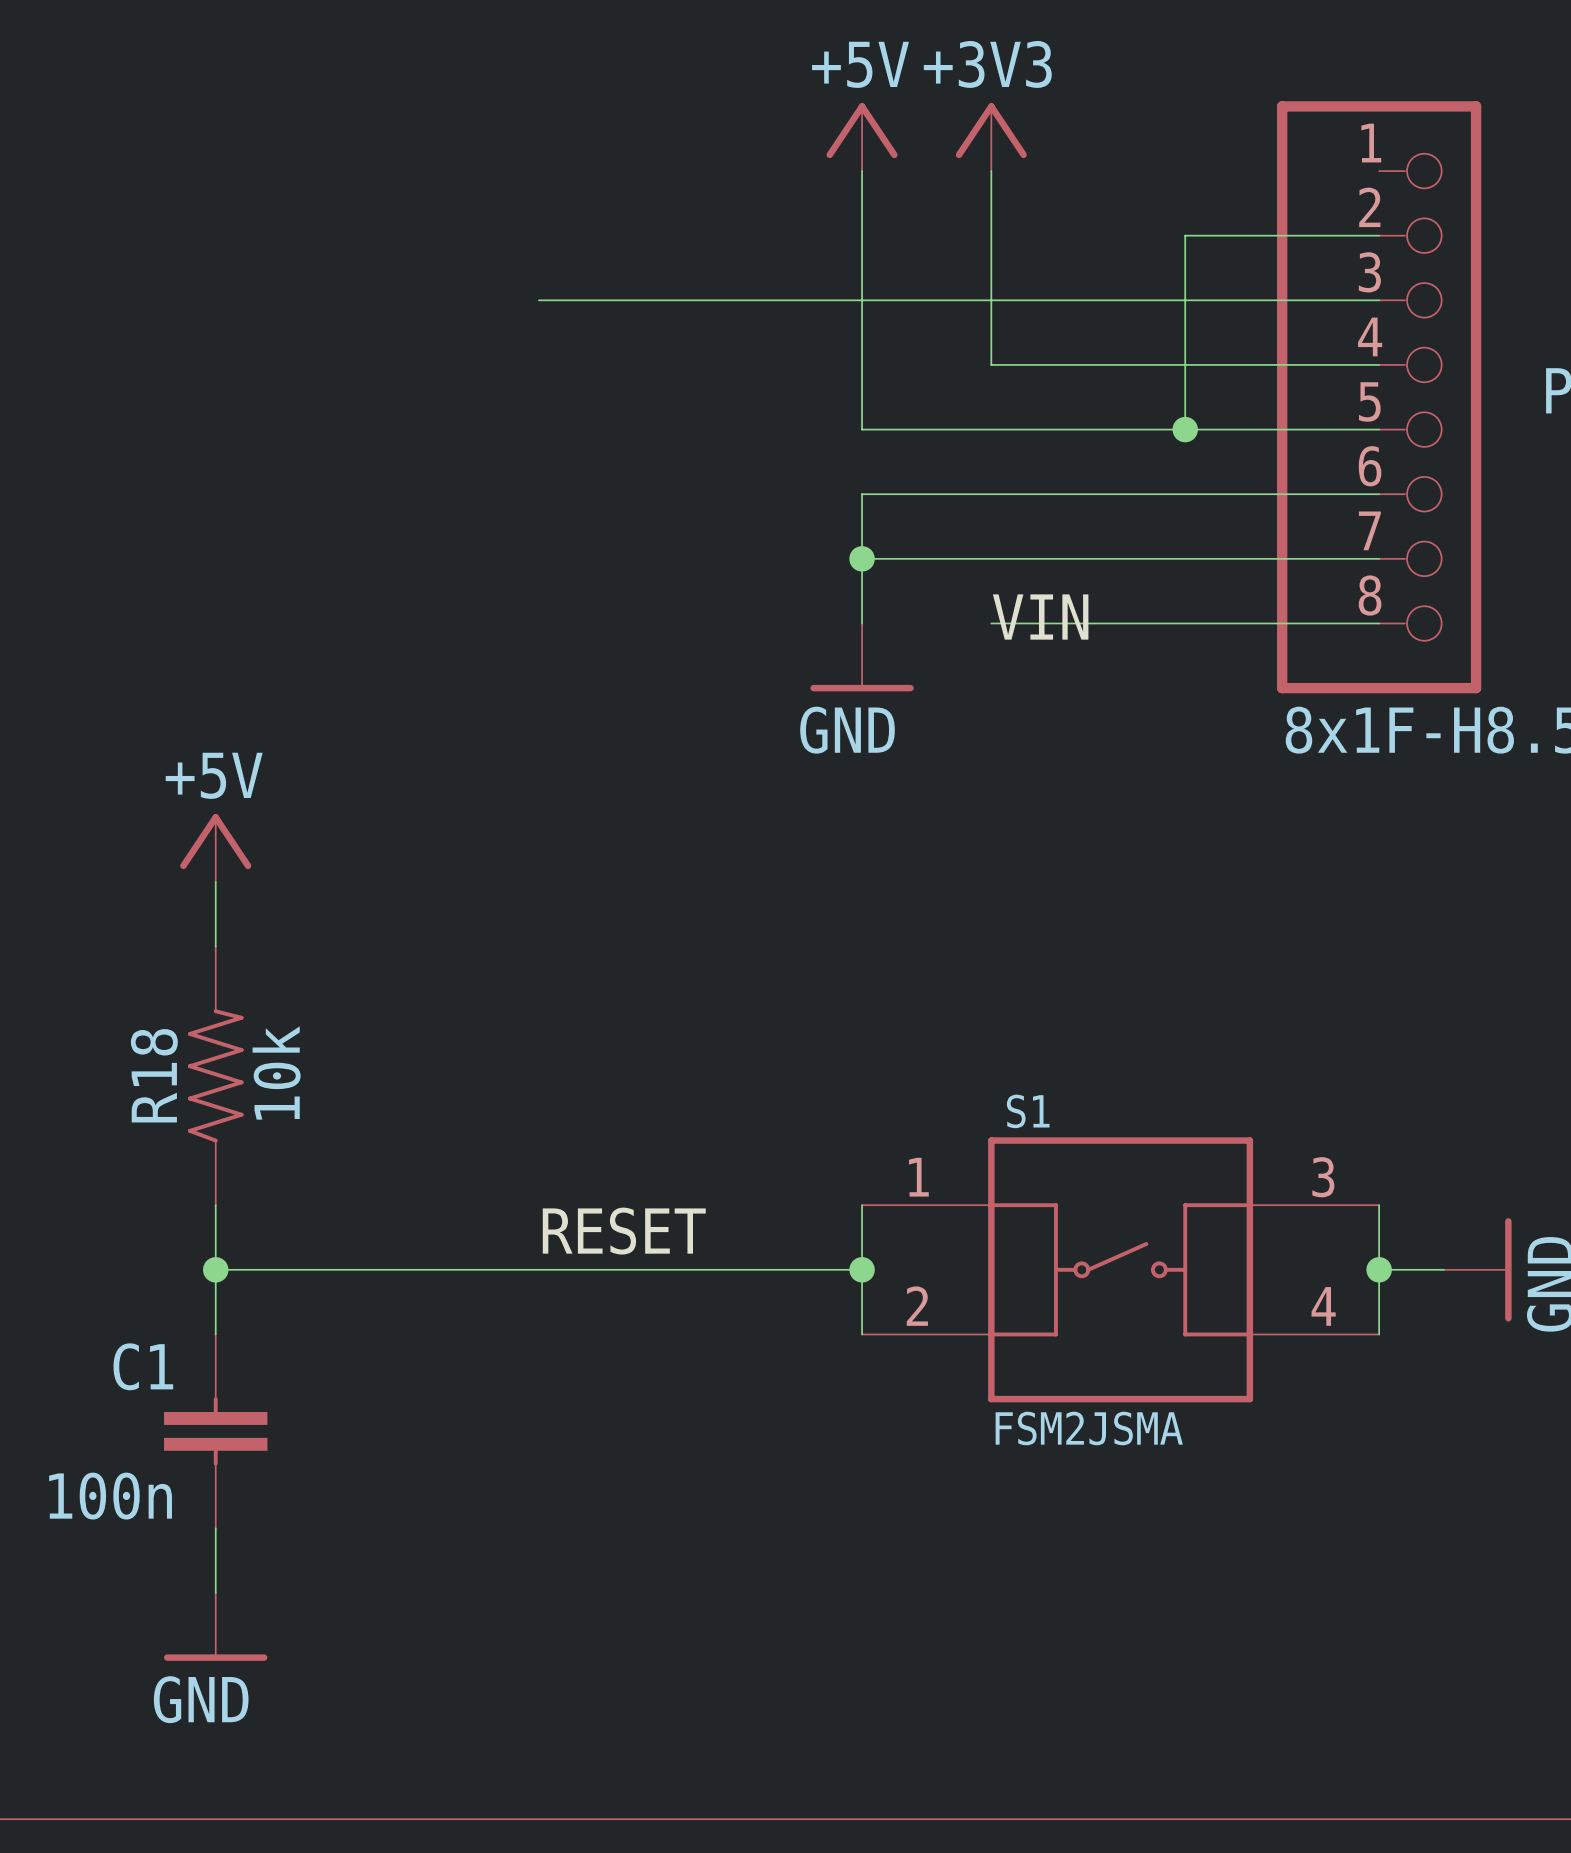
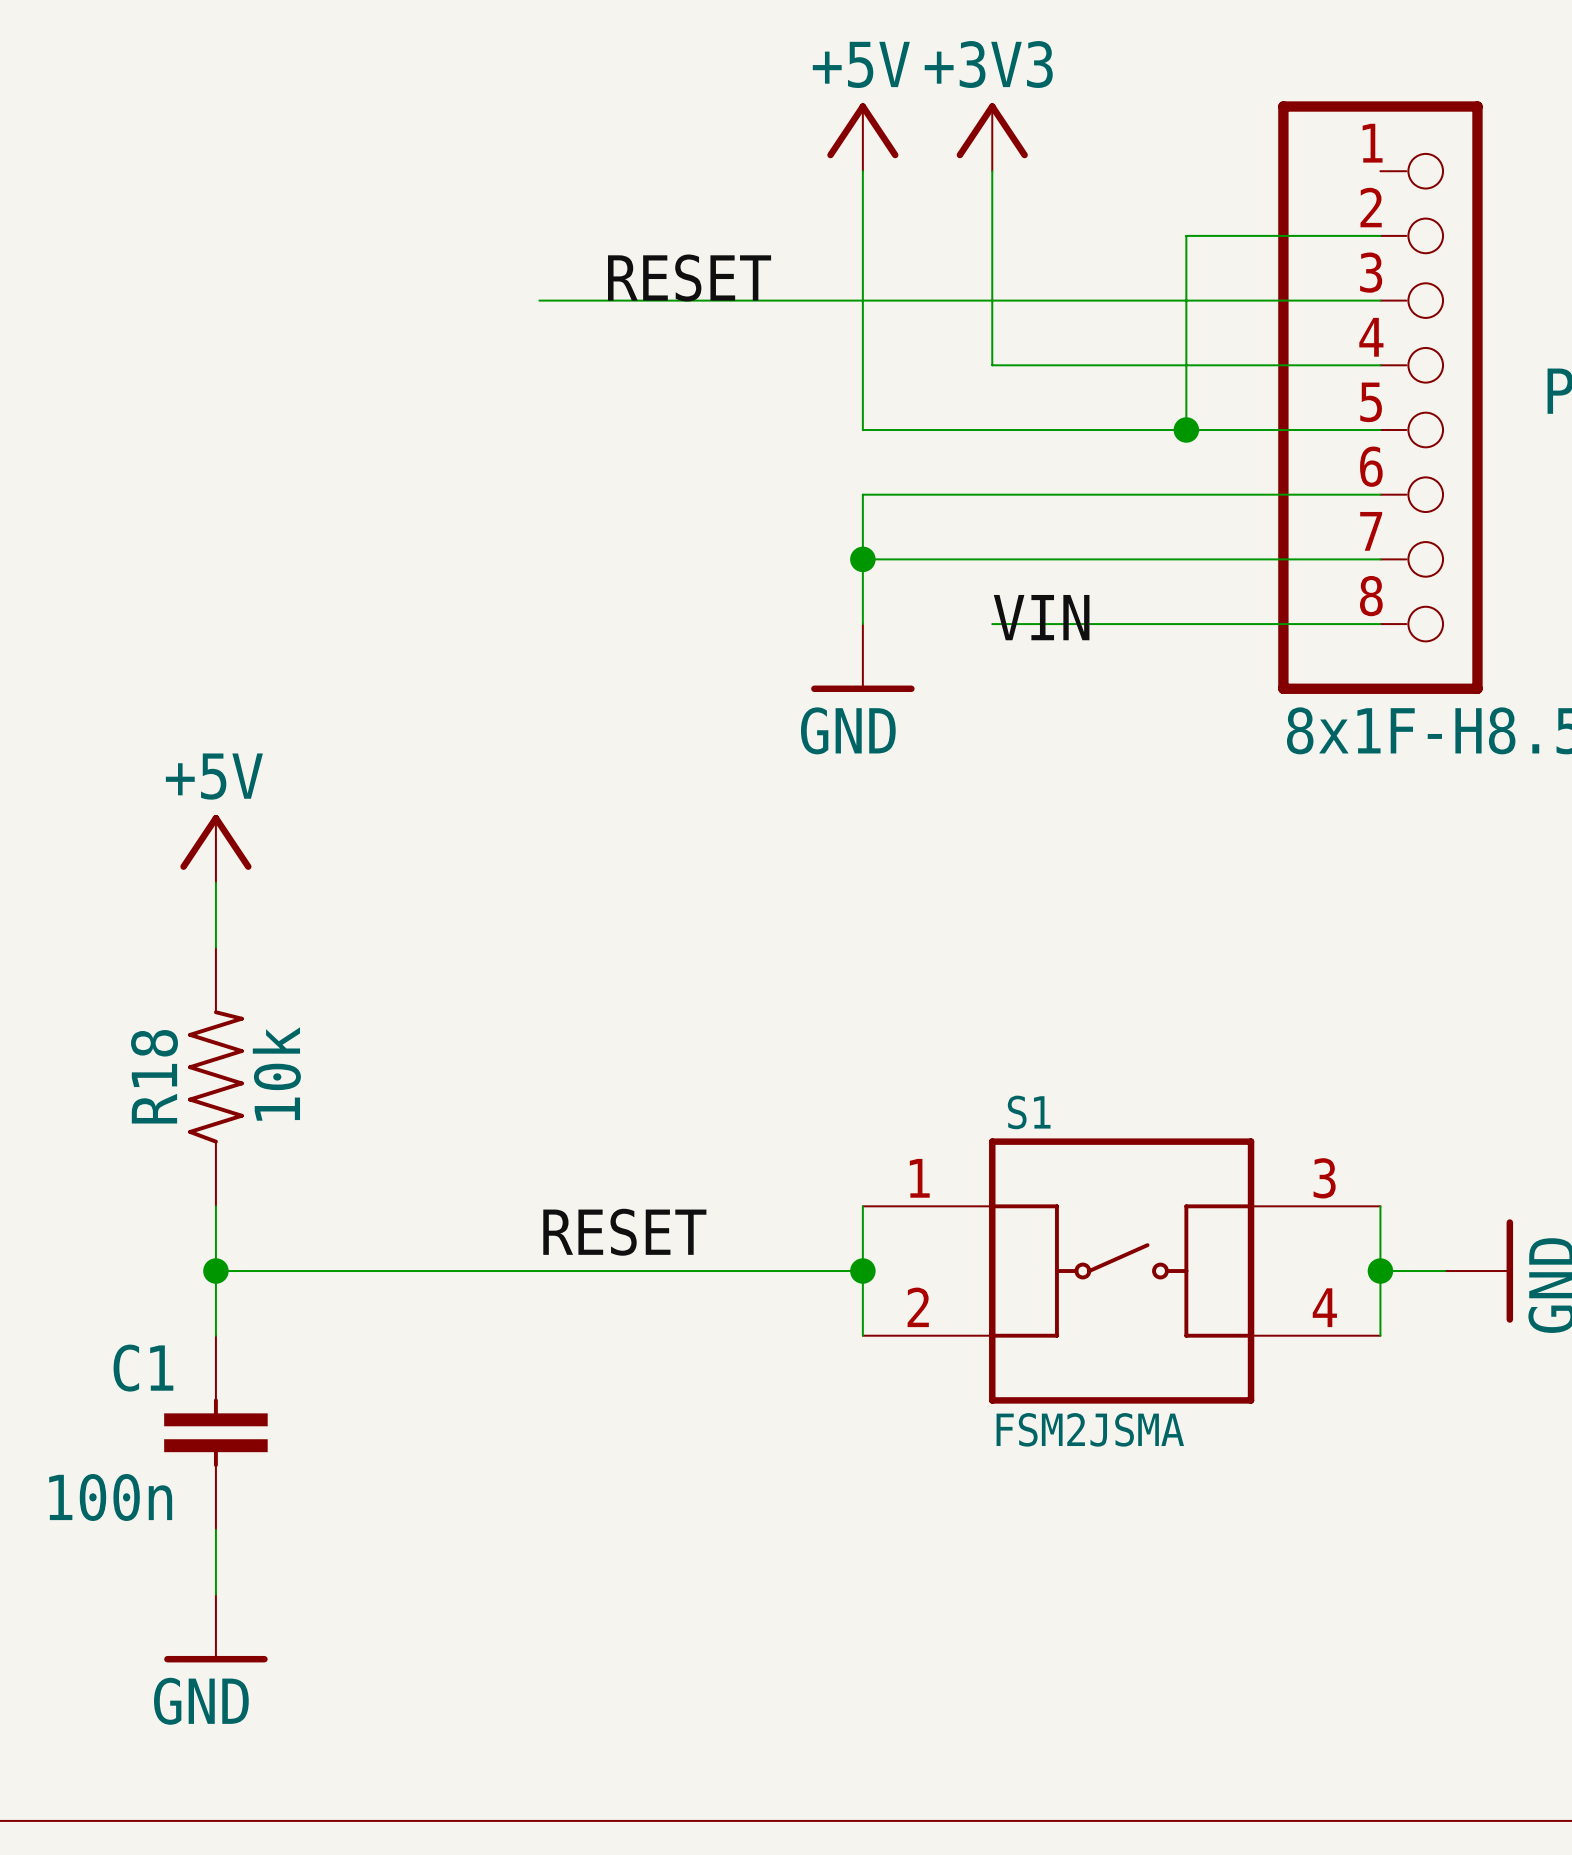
label: none -> RESET (689, 277)

